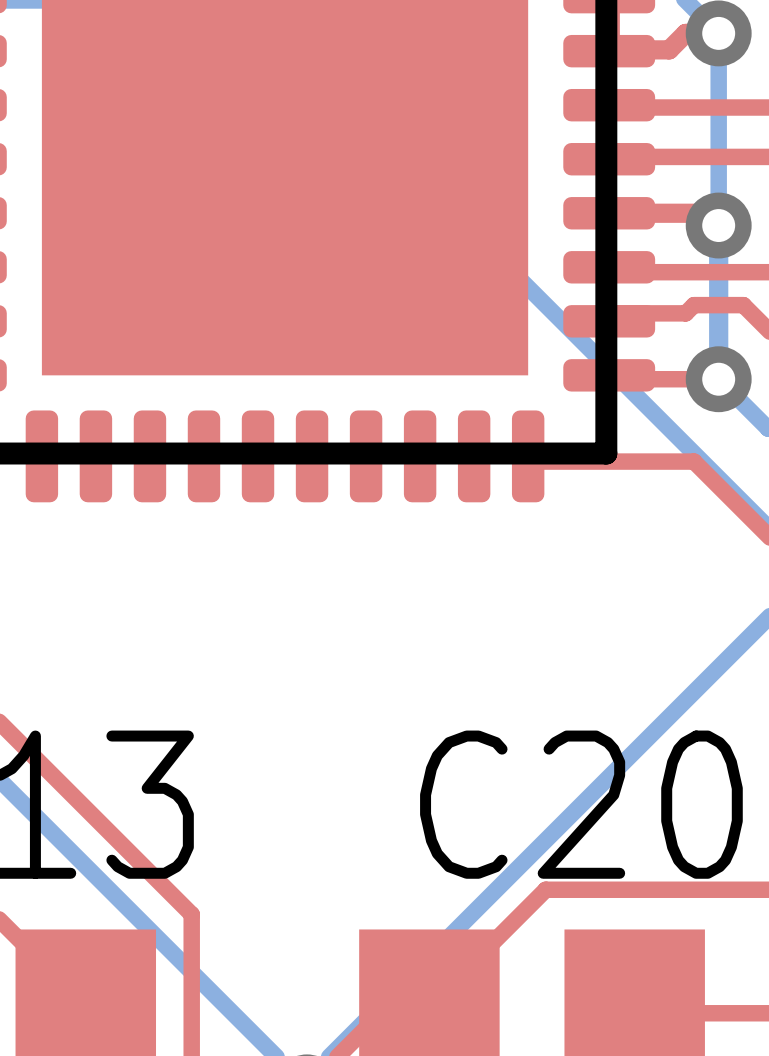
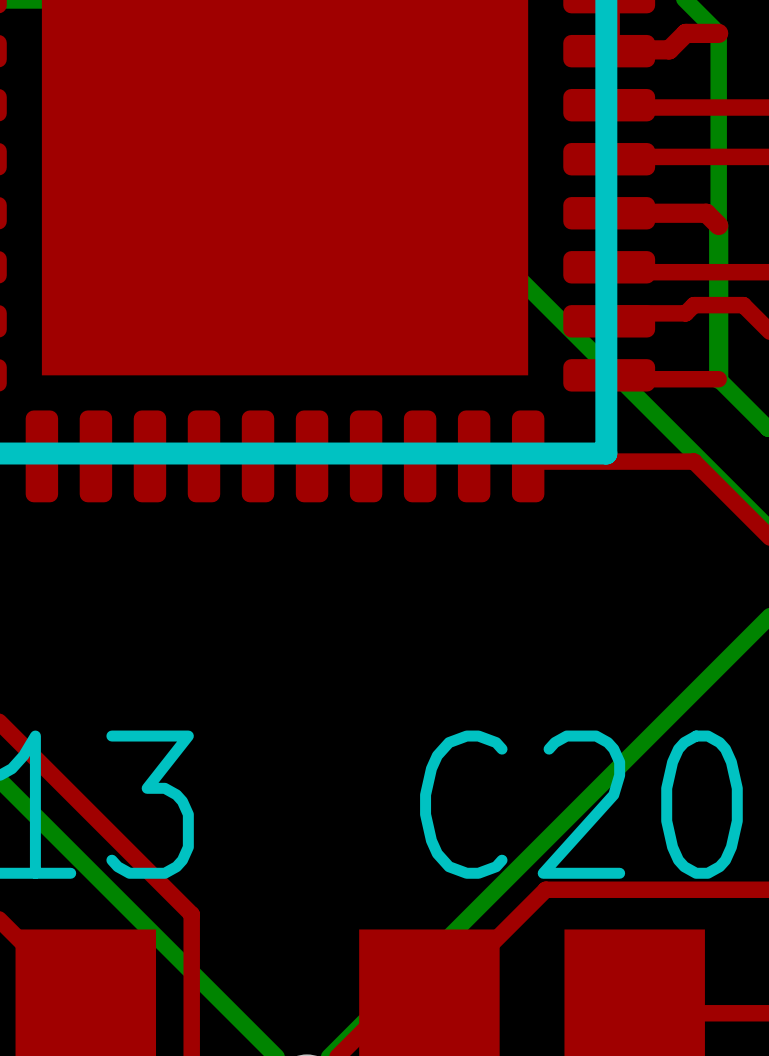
via: (718, 33) -> none
via: (718, 225) -> none
via: (718, 379) -> none

